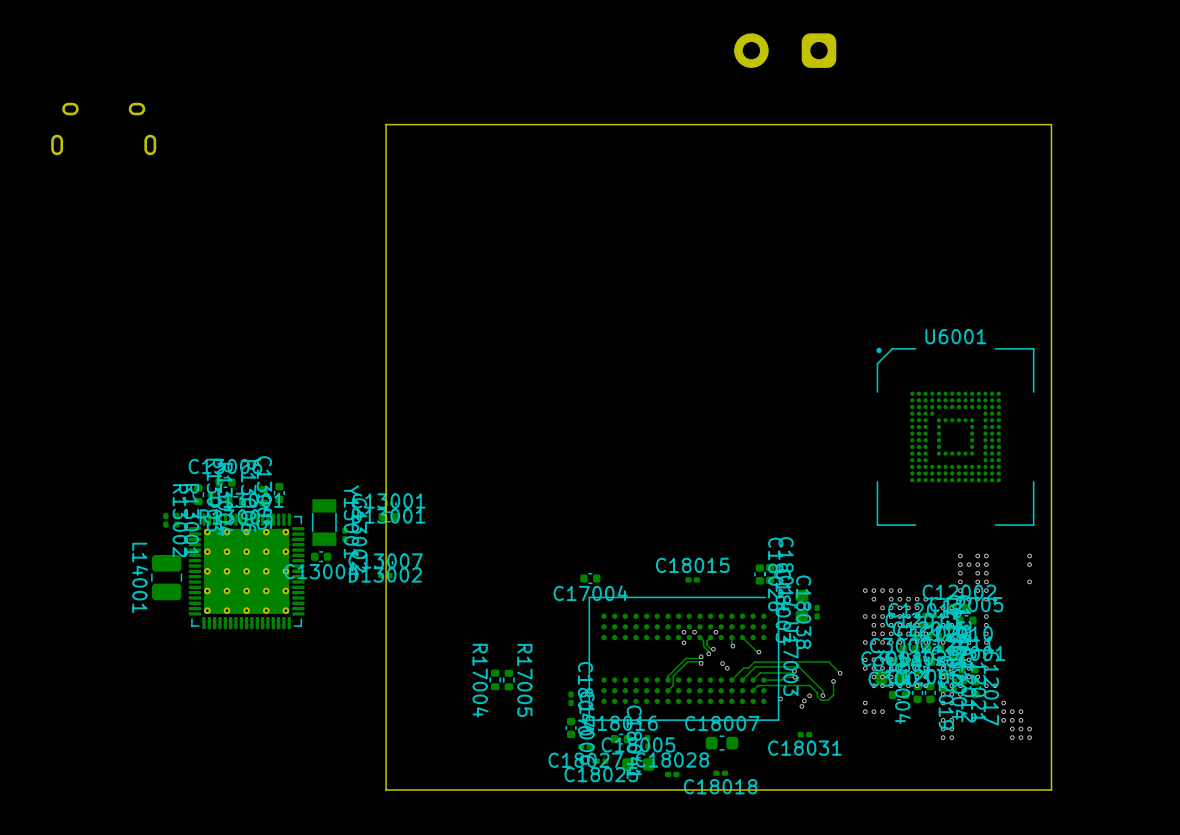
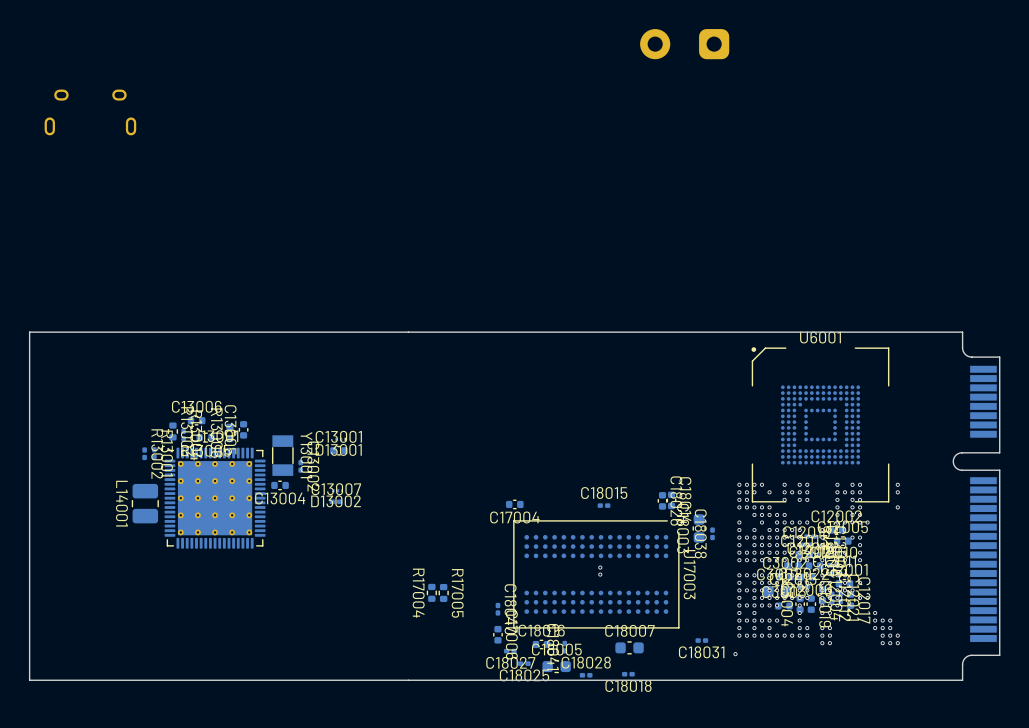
board edge: (1051, 124) (386, 124) (386, 790) (1051, 790) (1051, 124) -> none
board edge: none -> (962, 332) (29, 332) (29, 680) (962, 680)
U6001 position: (955, 436) -> (820, 424)
via: none -> (739, 484)
via: none -> (746, 484)
via: none -> (754, 484)
via: none -> (762, 484)
via: none -> (784, 484)
via: none -> (799, 484)
via: none -> (807, 484)
via: none -> (739, 492)
via: none -> (746, 492)
via: none -> (754, 492)
via: none -> (769, 492)
via: none -> (784, 492)
via: none -> (792, 492)
via: none -> (799, 492)
via: none -> (807, 492)
via: none -> (739, 499)
via: none -> (746, 499)
via: none -> (784, 499)
via: none -> (799, 499)
via: none -> (807, 499)
part: none -> (976, 506)
via: none -> (739, 507)
via: none -> (746, 507)
via: none -> (754, 507)
via: none -> (762, 507)
via: none -> (769, 507)
via: none -> (739, 522)
via: none -> (739, 530)
via: none -> (754, 530)
via: none -> (739, 537)
via: none -> (746, 537)
via: none -> (852, 537)
via: none -> (739, 545)
via: none -> (754, 545)
via: (683, 632) -> none
via: (694, 632) -> none
via: (715, 632) -> none
via: none -> (739, 552)
via: none -> (746, 552)
via: none -> (754, 552)
track: (699, 637) (708, 653) -> none
track: (710, 637) (706, 641) (706, 644) (713, 649) -> none
track: (731, 637) (732, 646) -> none
track: (742, 637) (758, 652) -> none
via: (683, 642) -> none
via: none -> (739, 560)
via: none -> (746, 560)
via: (732, 646) -> none
via: (713, 649) -> none
via: none -> (600, 567)
via: (758, 652) -> none
via: (708, 653) -> none
via: (701, 656) -> none
via: none -> (600, 574)
track: (702, 658) (701, 656) (685, 658) (667, 676) (667, 680) -> none
via: none -> (739, 575)
via: none -> (746, 575)
track: (702, 661) (701, 663) (687, 661) (673, 676) (673, 685) (667, 690) -> none
via: (701, 663) -> none
via: (722, 663) -> none
via: (727, 668) -> none
via: none -> (739, 582)
track: (794, 671) (792, 672) (760, 672) (753, 680) -> none
via: (794, 671) -> none
track: (840, 673) (828, 661) (754, 661) (748, 667) (744, 667) (731, 680) -> none
via: (840, 673) -> none
track: (794, 677) (784, 677) (781, 680) (763, 680) -> none
via: (794, 677) -> none
via: none -> (739, 590)
via: none -> (746, 590)
via: none -> (754, 590)
track: (742, 680) (755, 666) (798, 666) (822, 690) (822, 695) -> none
track: (833, 681) (833, 695) (828, 700) (821, 700) (809, 685) (758, 685) (753, 690) -> none
via: (833, 681) -> none
via: none -> (739, 597)
via: none -> (754, 597)
via: none -> (739, 605)
via: none -> (746, 605)
via: none -> (754, 605)
via: none -> (762, 605)
via: none -> (769, 605)
via: none -> (777, 605)
via: none -> (799, 605)
via: (809, 695) -> none
via: (822, 695) -> none
via: (780, 698) -> none
via: (804, 700) -> none
via: none -> (739, 613)
via: none -> (799, 613)
via: (801, 706) -> none
via: none -> (739, 620)
via: none -> (746, 620)
via: none -> (777, 620)
via: none -> (799, 620)
via: none -> (739, 628)
via: none -> (754, 628)
via: none -> (769, 628)
via: none -> (799, 628)
via: none -> (807, 628)
via: none -> (739, 635)
via: none -> (746, 635)
via: none -> (754, 635)
via: none -> (762, 635)
via: none -> (769, 635)
via: none -> (777, 635)
via: none -> (784, 635)
via: none -> (792, 635)
via: none -> (799, 635)
via: none -> (807, 635)
via: none -> (735, 654)

